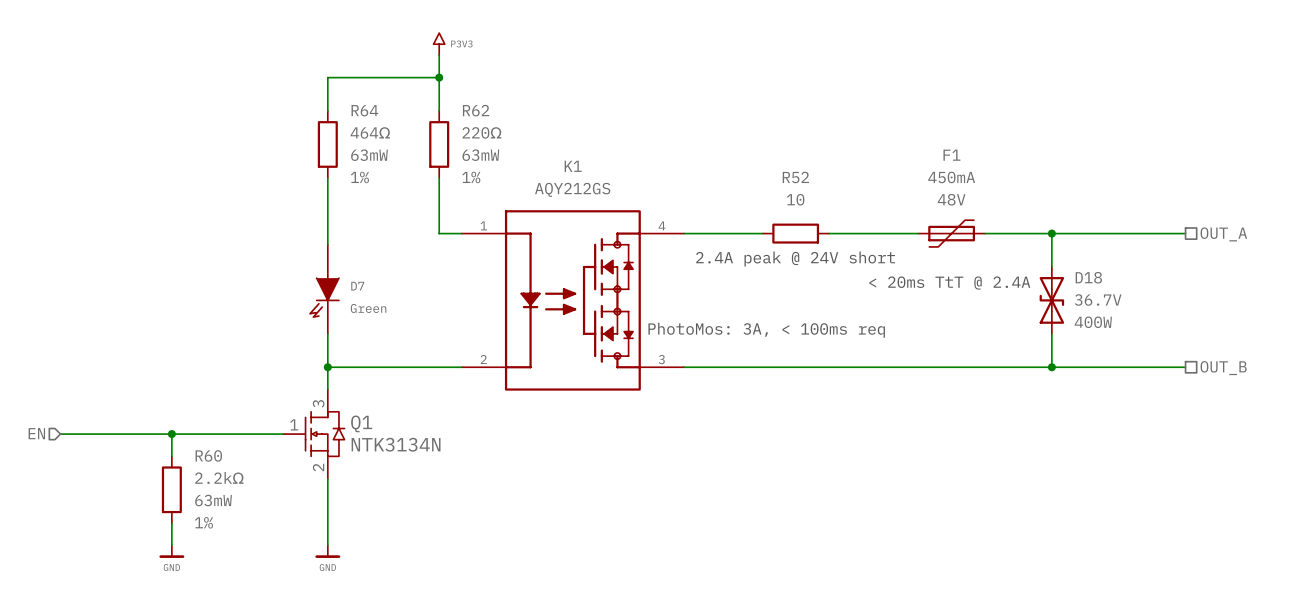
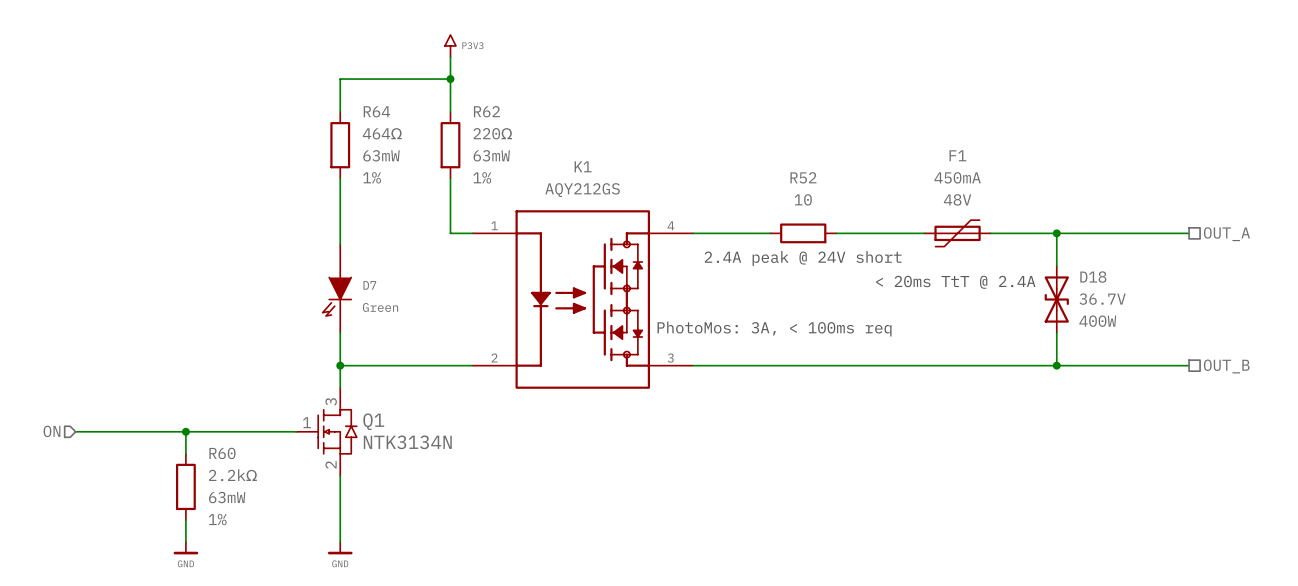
hierarchical label: EN (36, 433) -> ON (52, 431)

